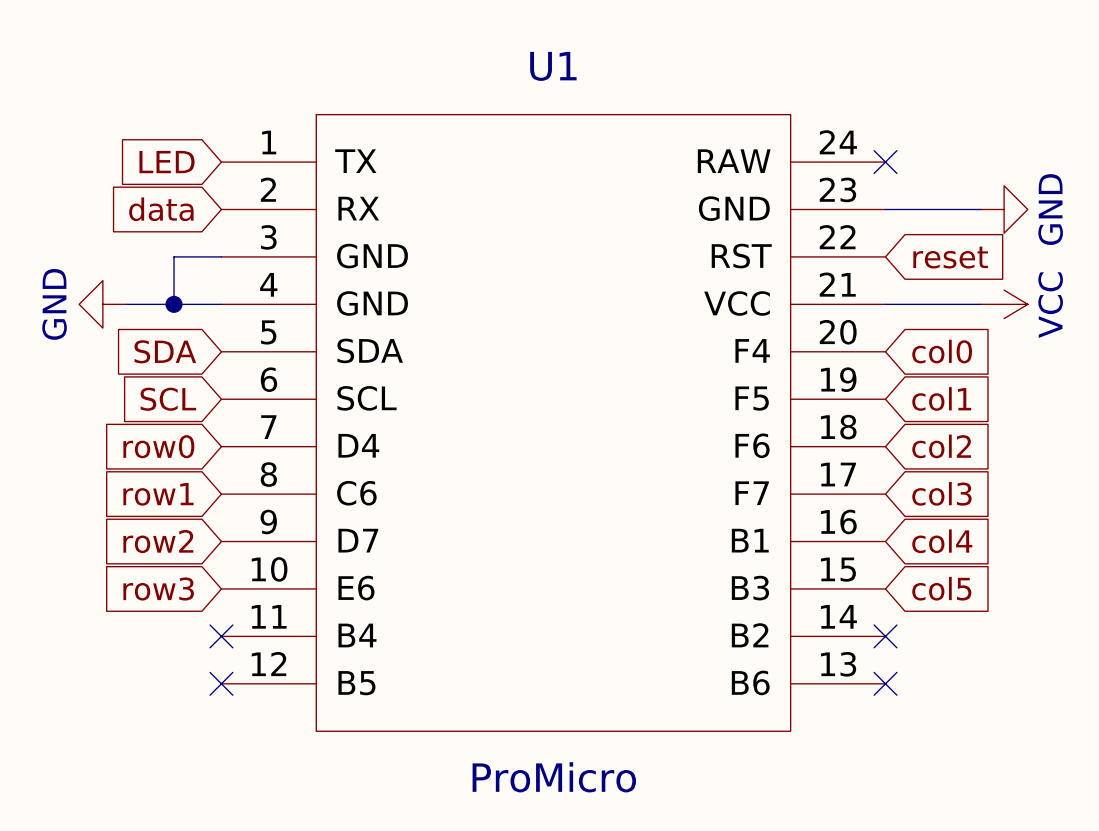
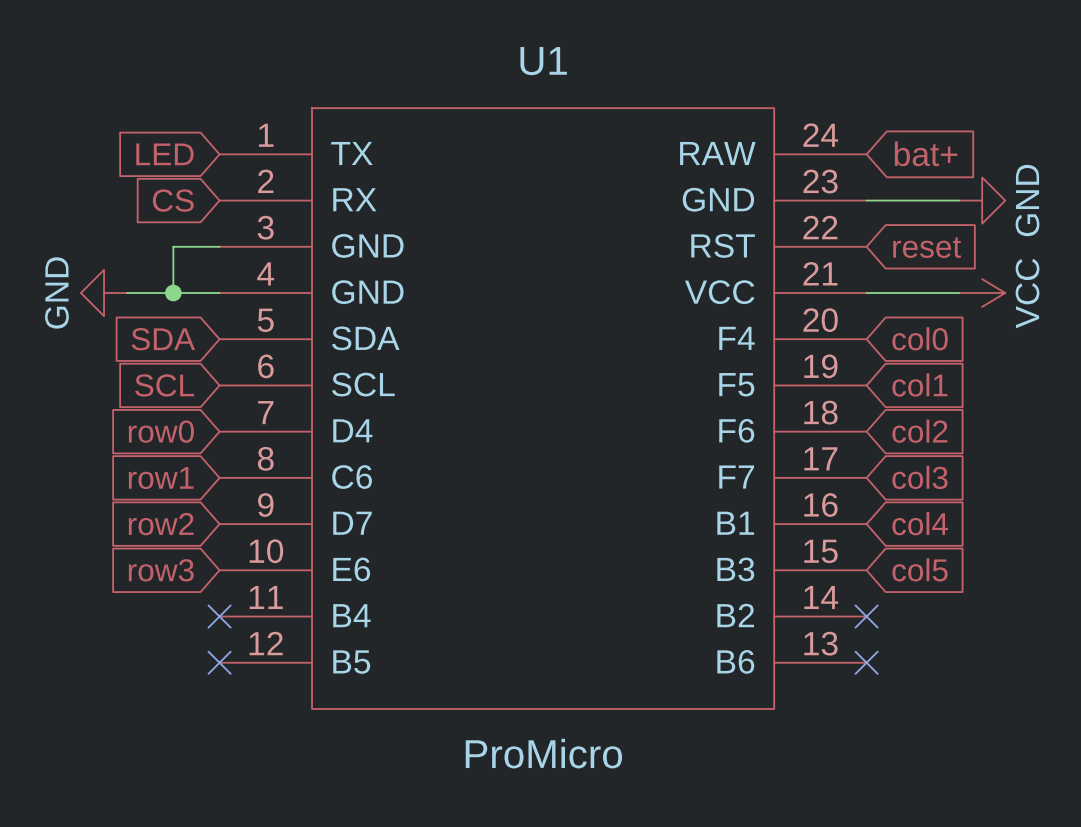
global label: none -> bat+ (926, 153)
no-connect mark: (885, 162) -> none
global label: data (161, 209) -> CS (173, 200)

